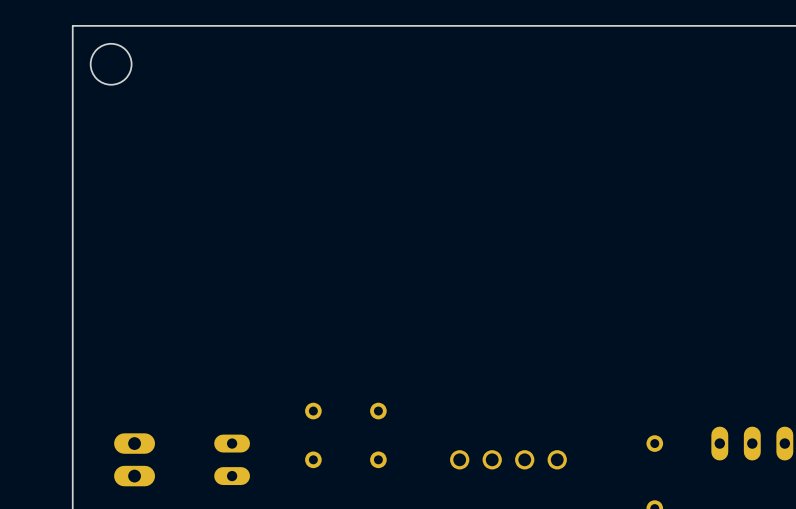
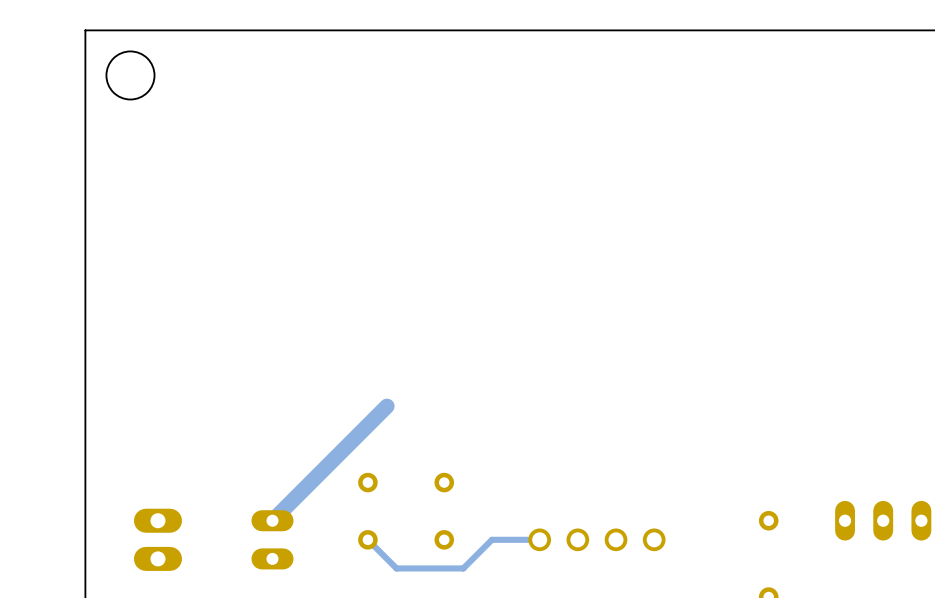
track: none -> (387, 406) (272, 520)
track: none -> (539, 539) (491, 539) (463, 568) (396, 568) (367, 539)

